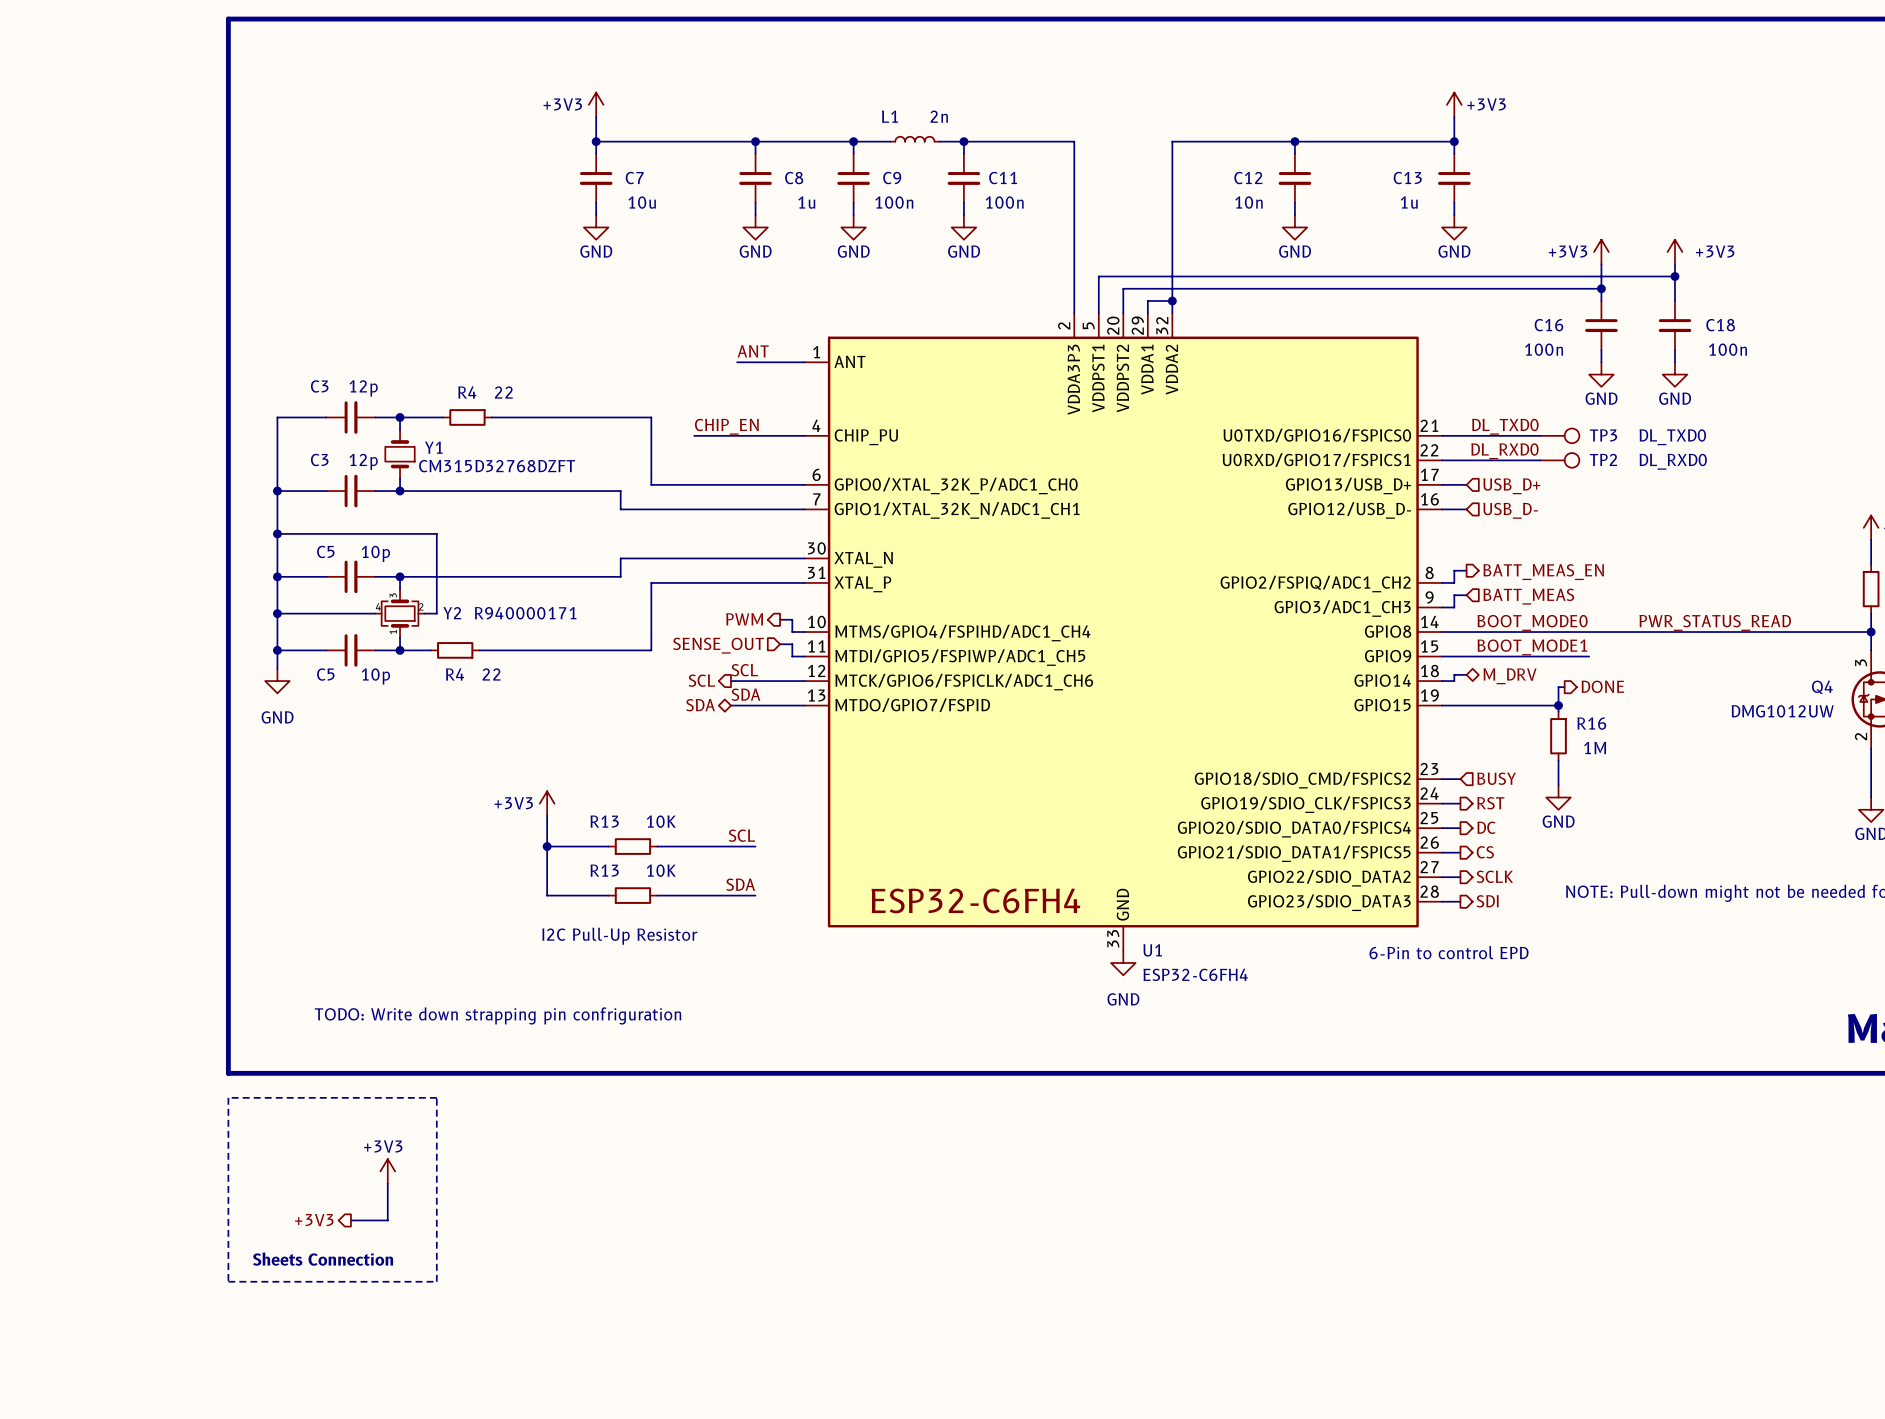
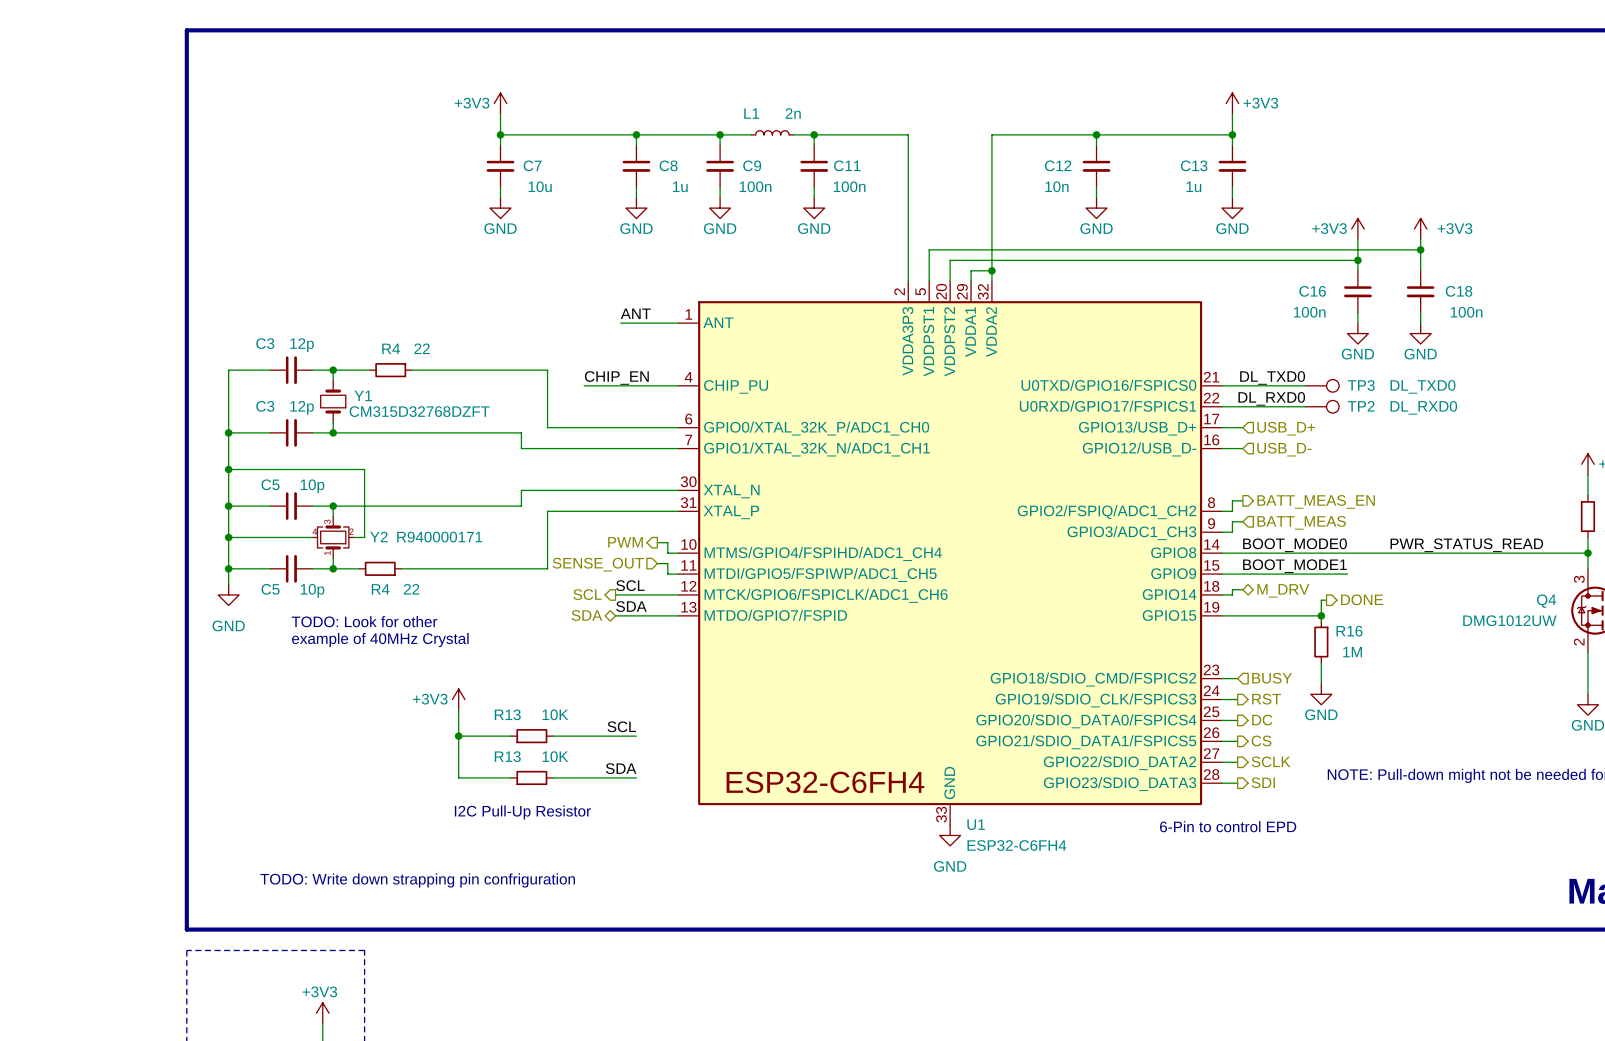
text: none -> TODO: Look for other (364, 621)
text: none -> example of 40MHz Crystal (380, 639)

